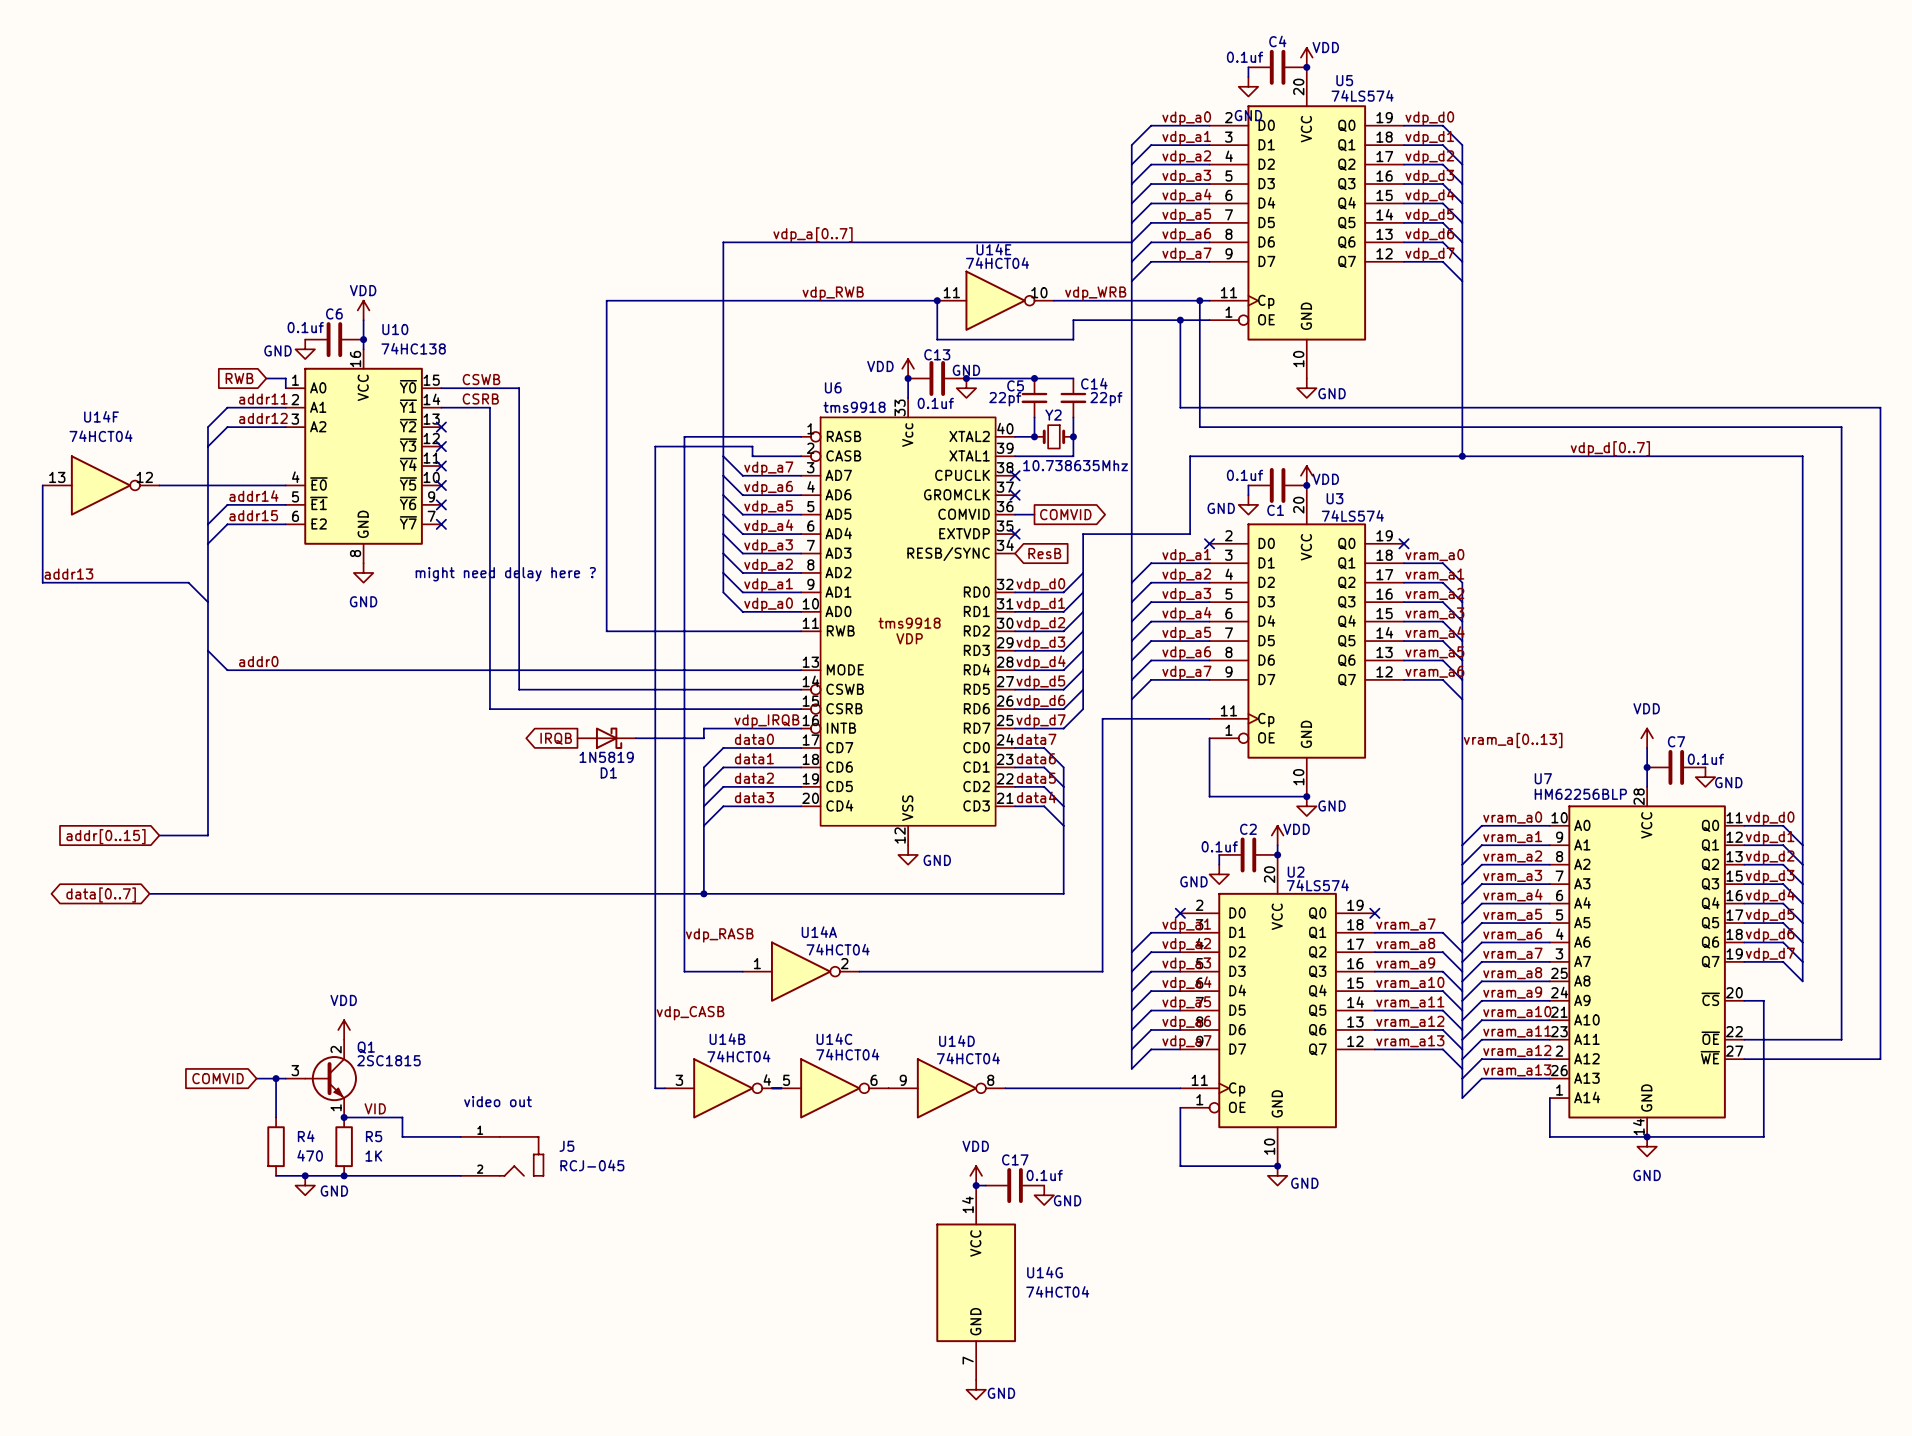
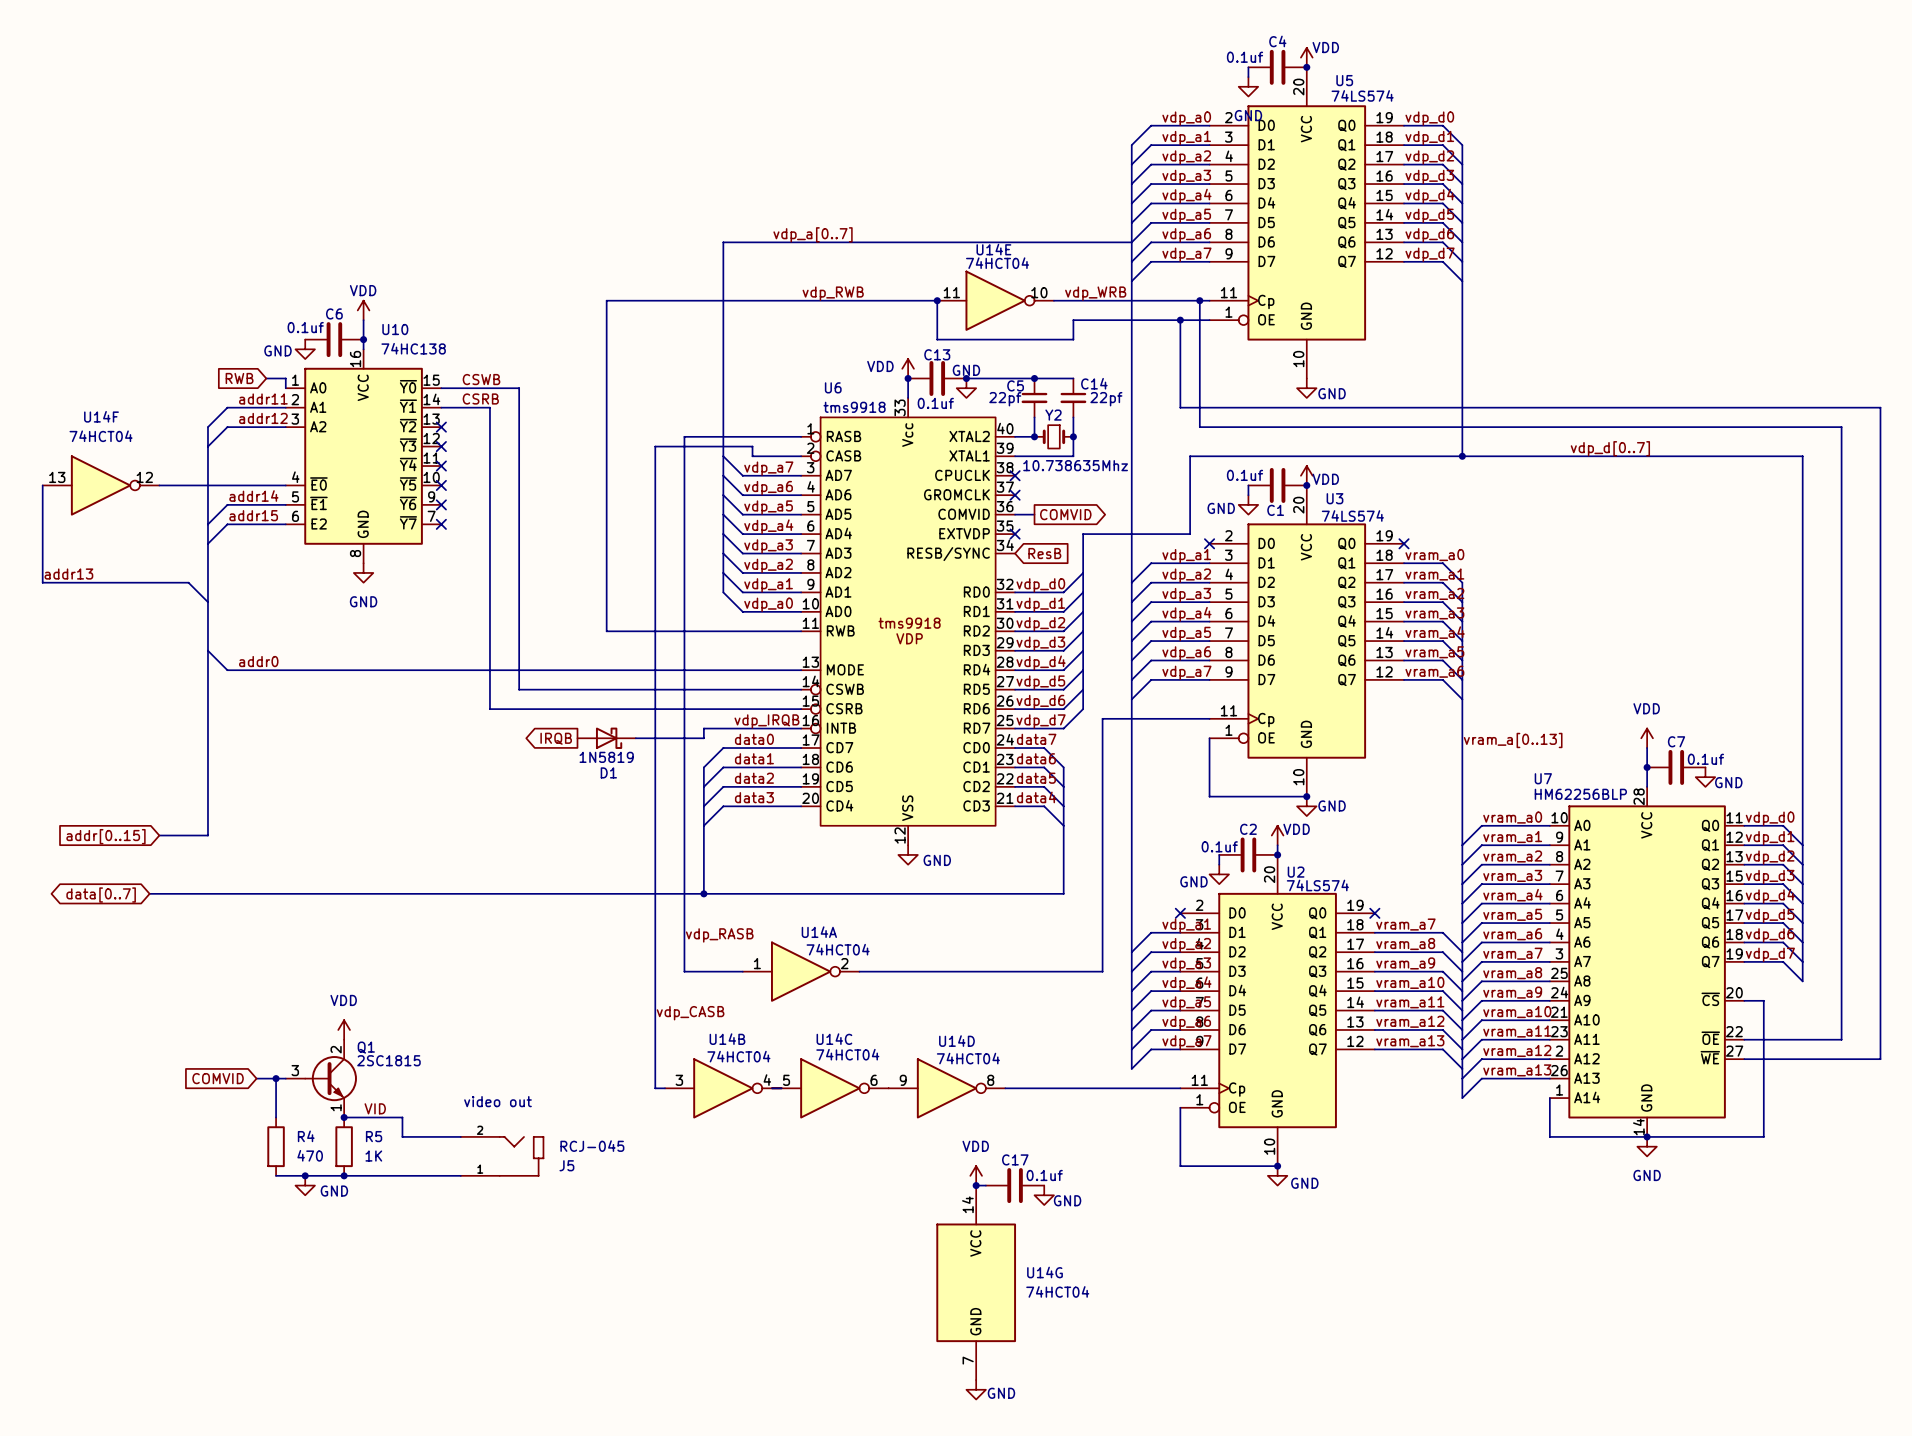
text: might need delay here ? (505, 574) -> none
J5 flip: as is (521, 1156) -> up-down (521, 1156)

